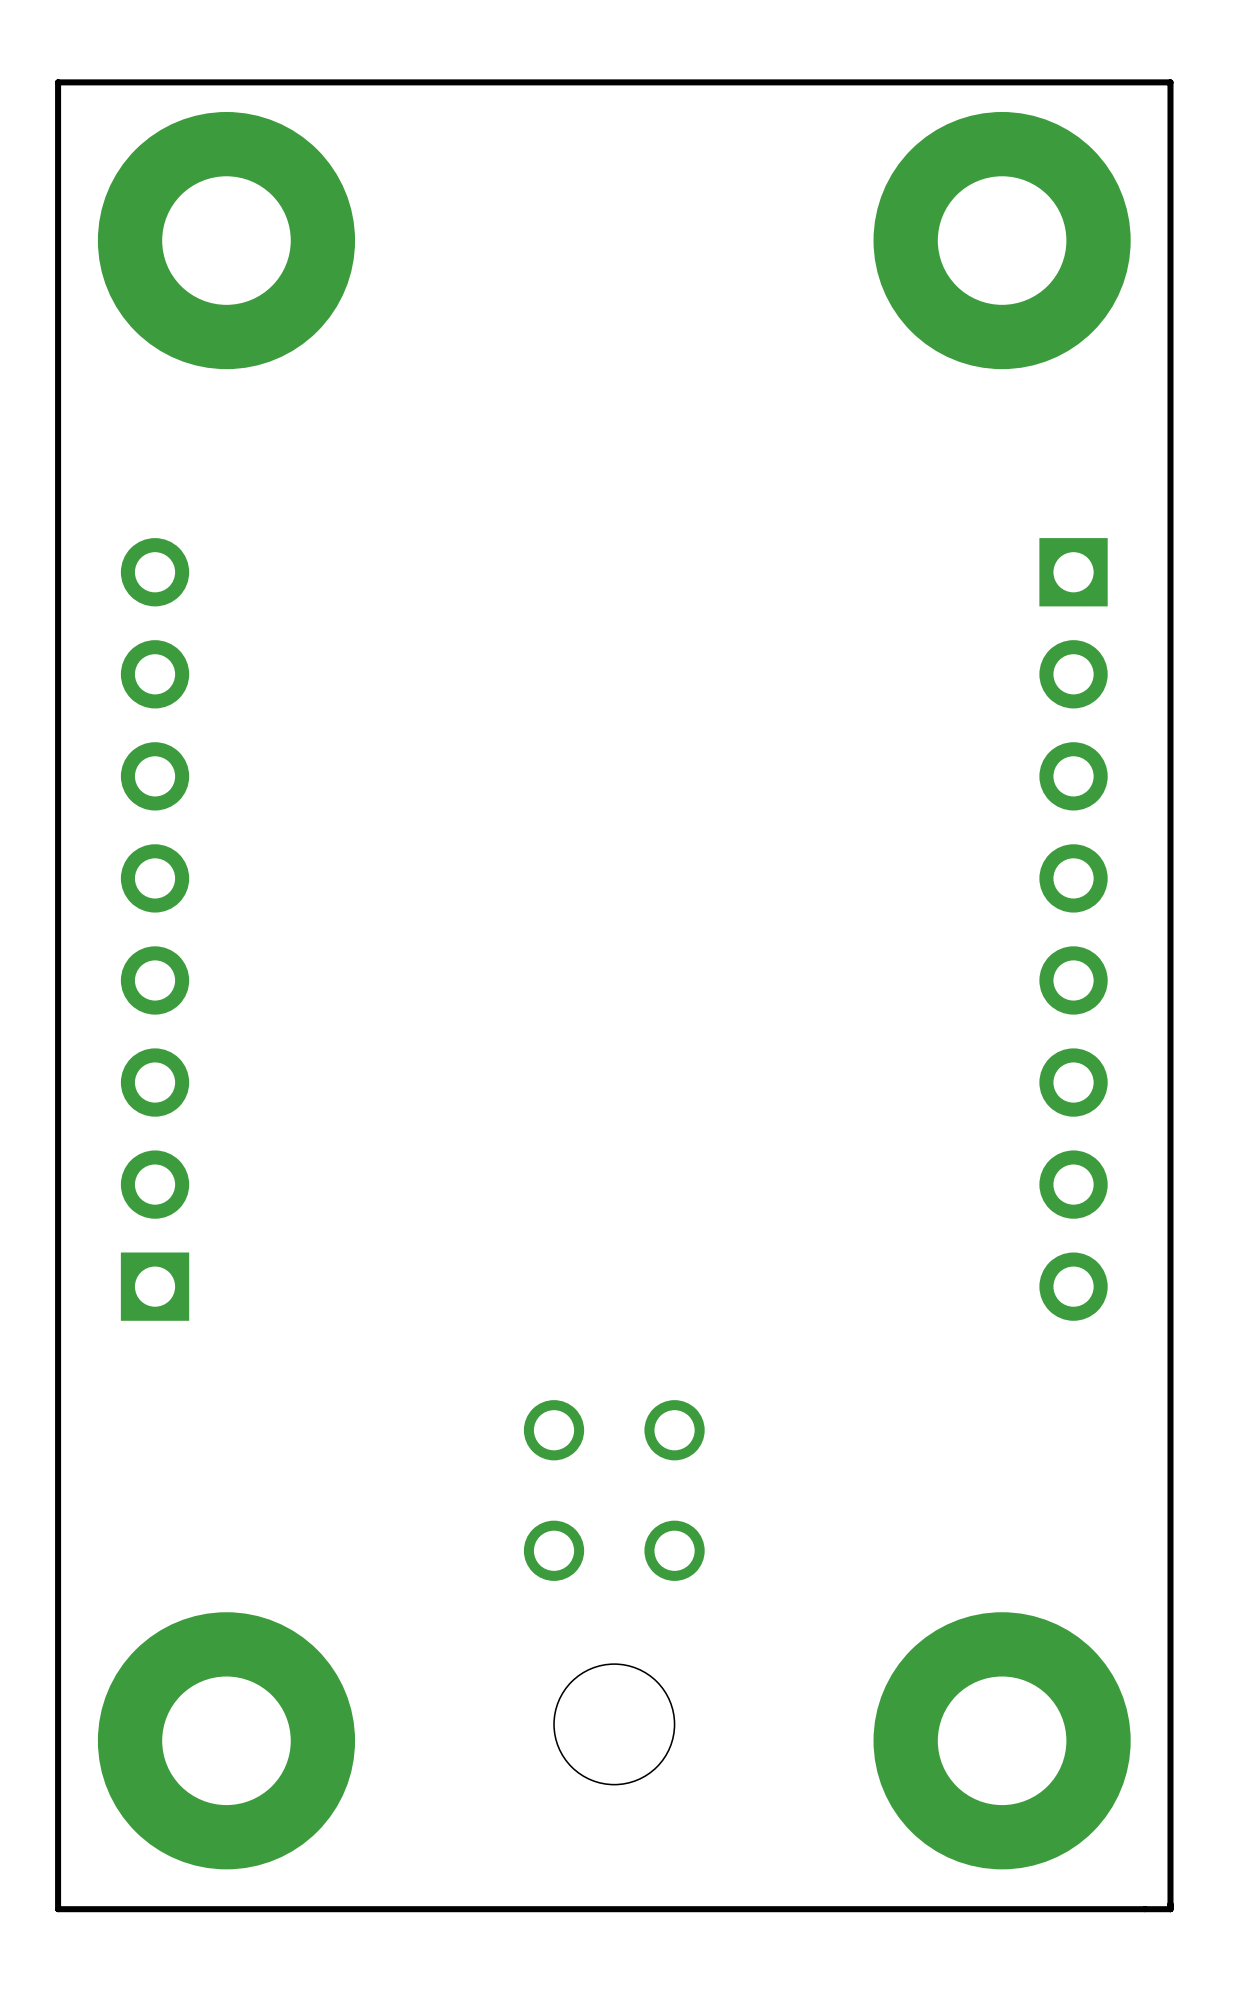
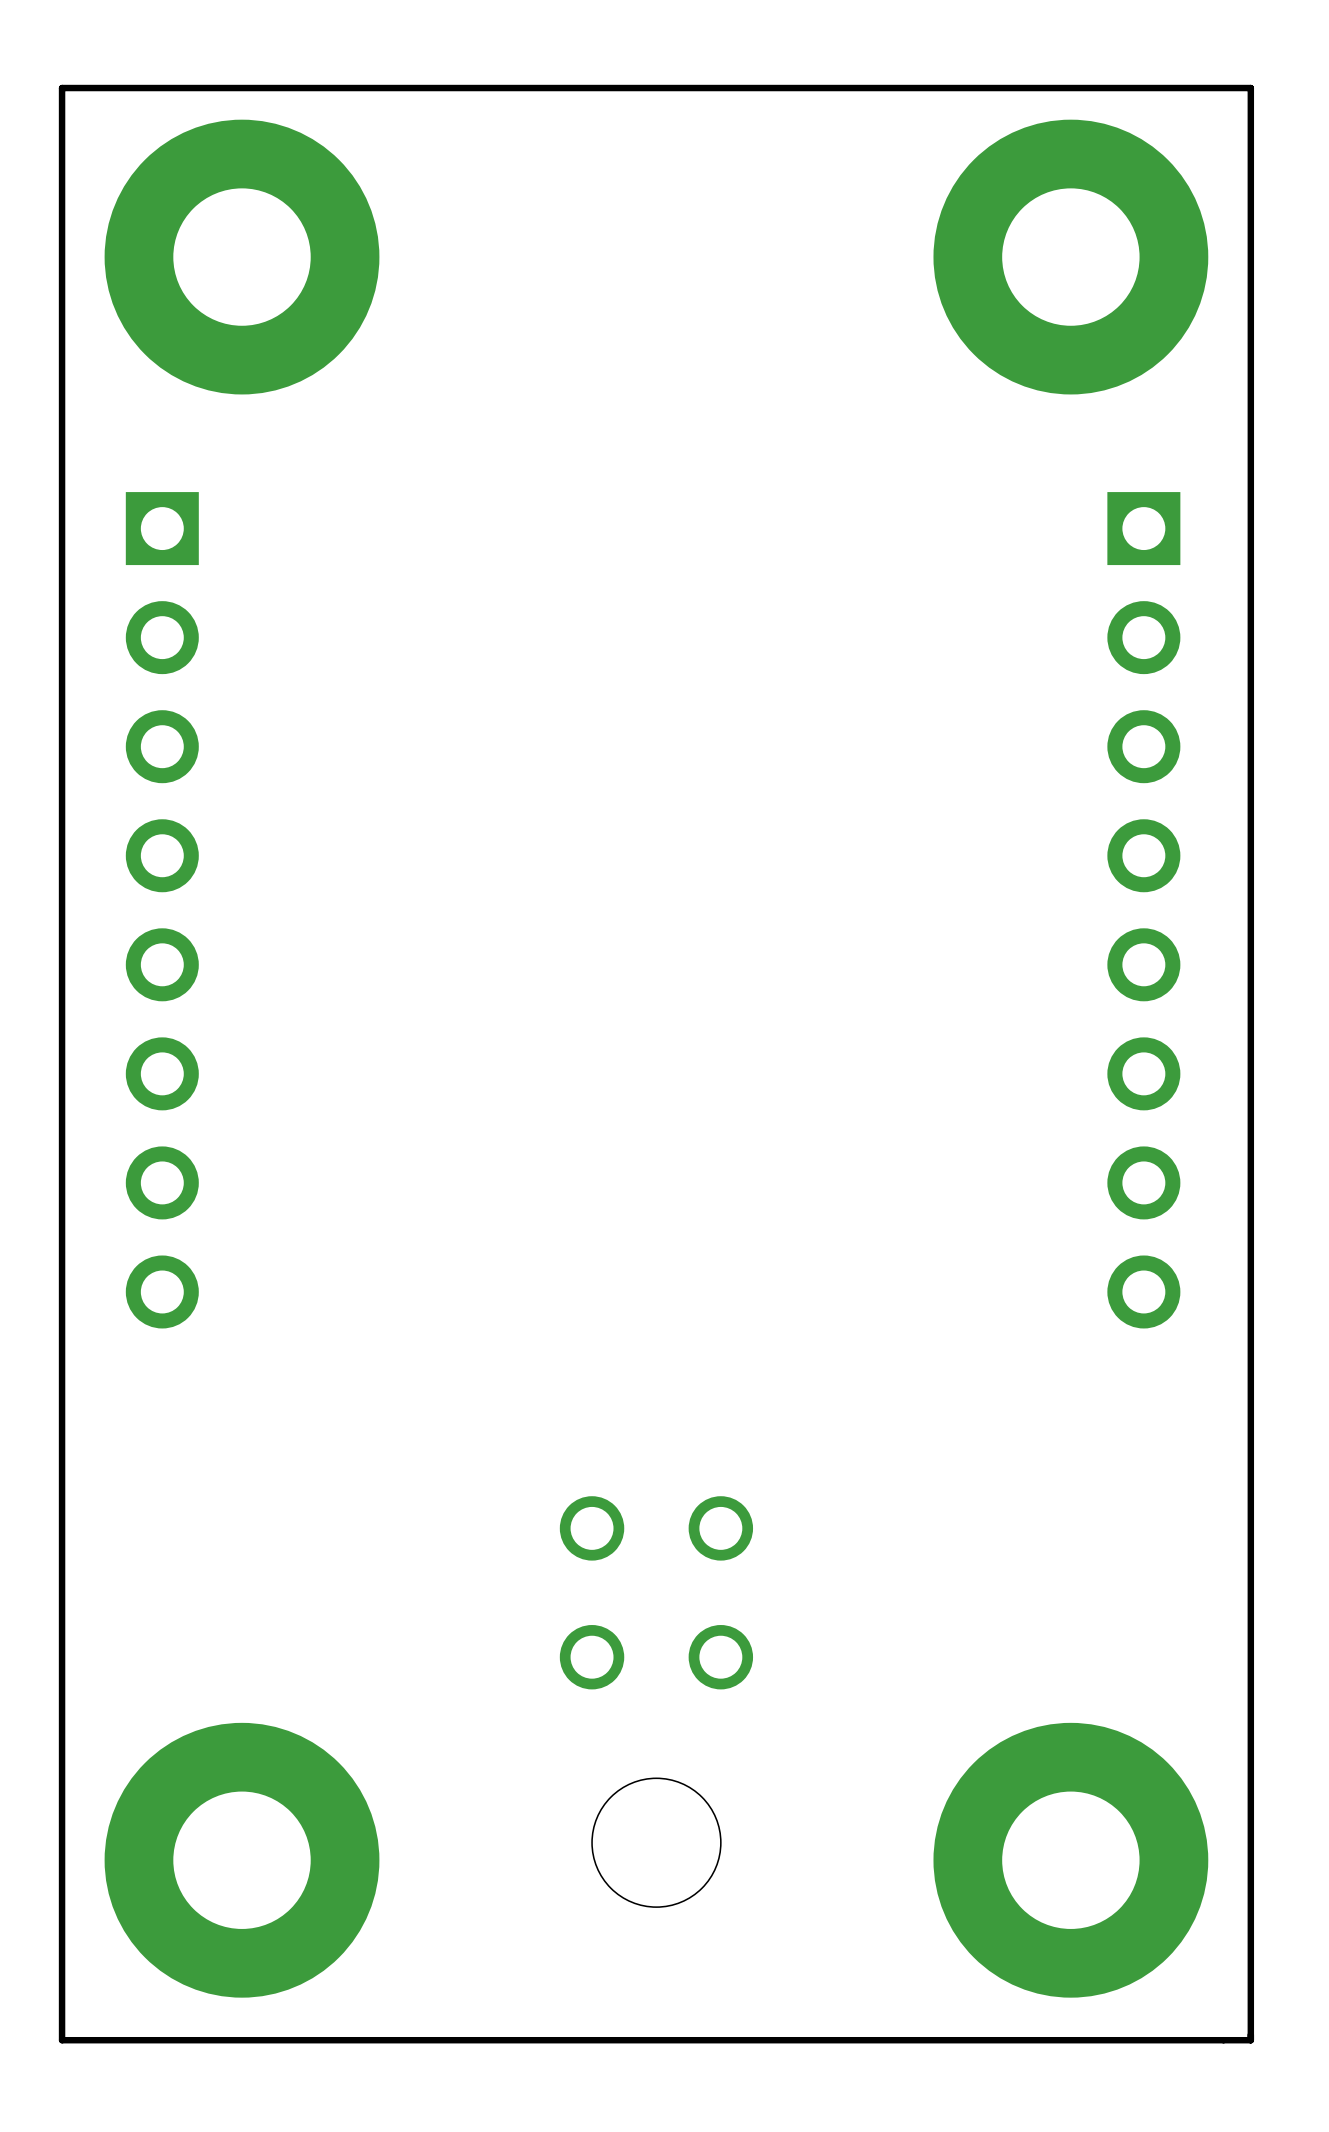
part rotation: 0° (155, 929) -> 180° (162, 910)
part position: (1073, 929) -> (1143, 910)

